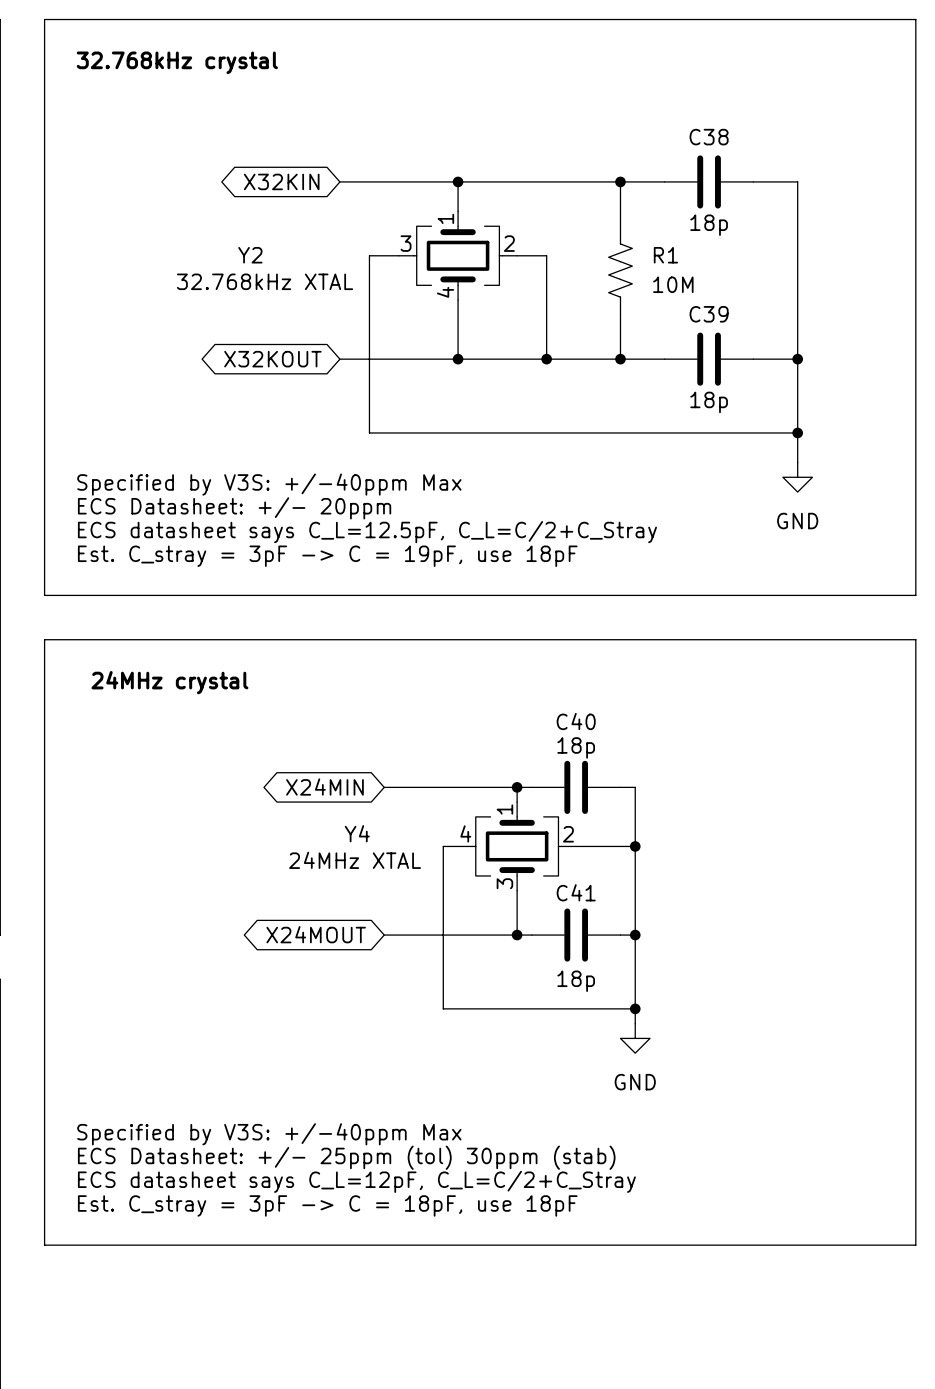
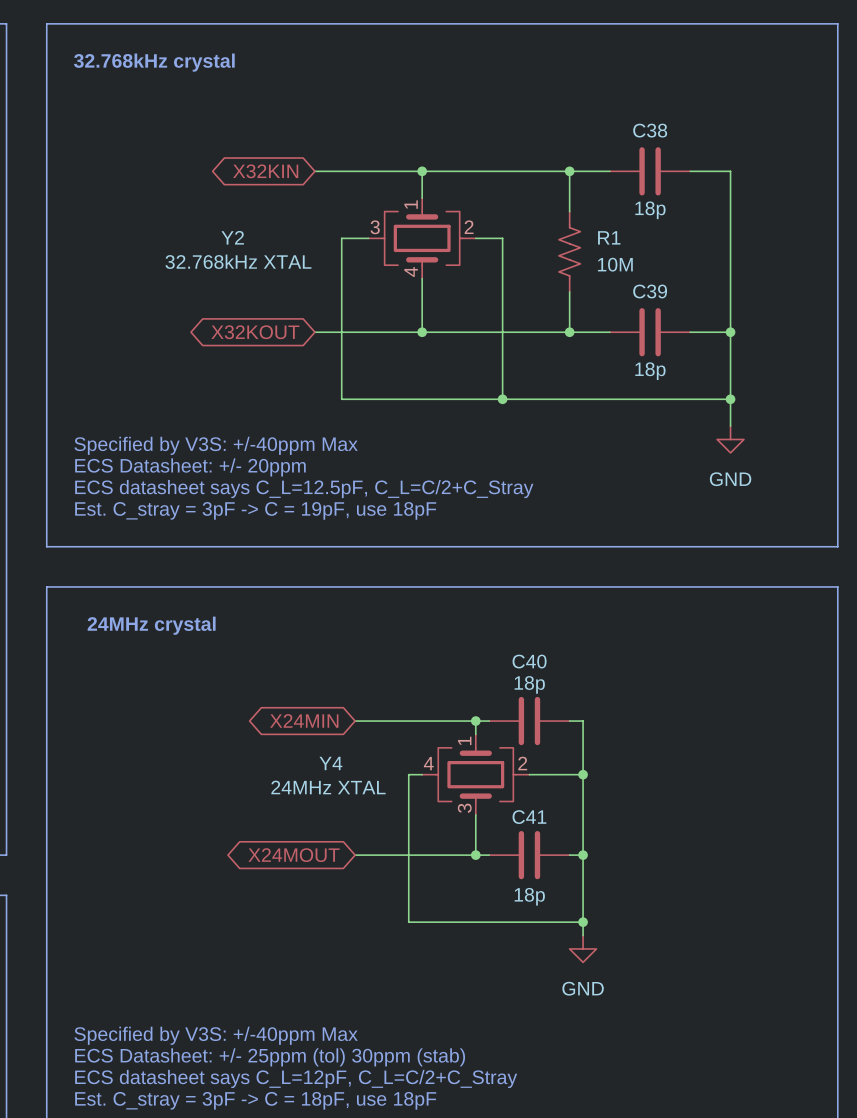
wire: none -> (502, 332) (502, 399)
junction: (546, 359) -> none
junction: none -> (502, 399)

